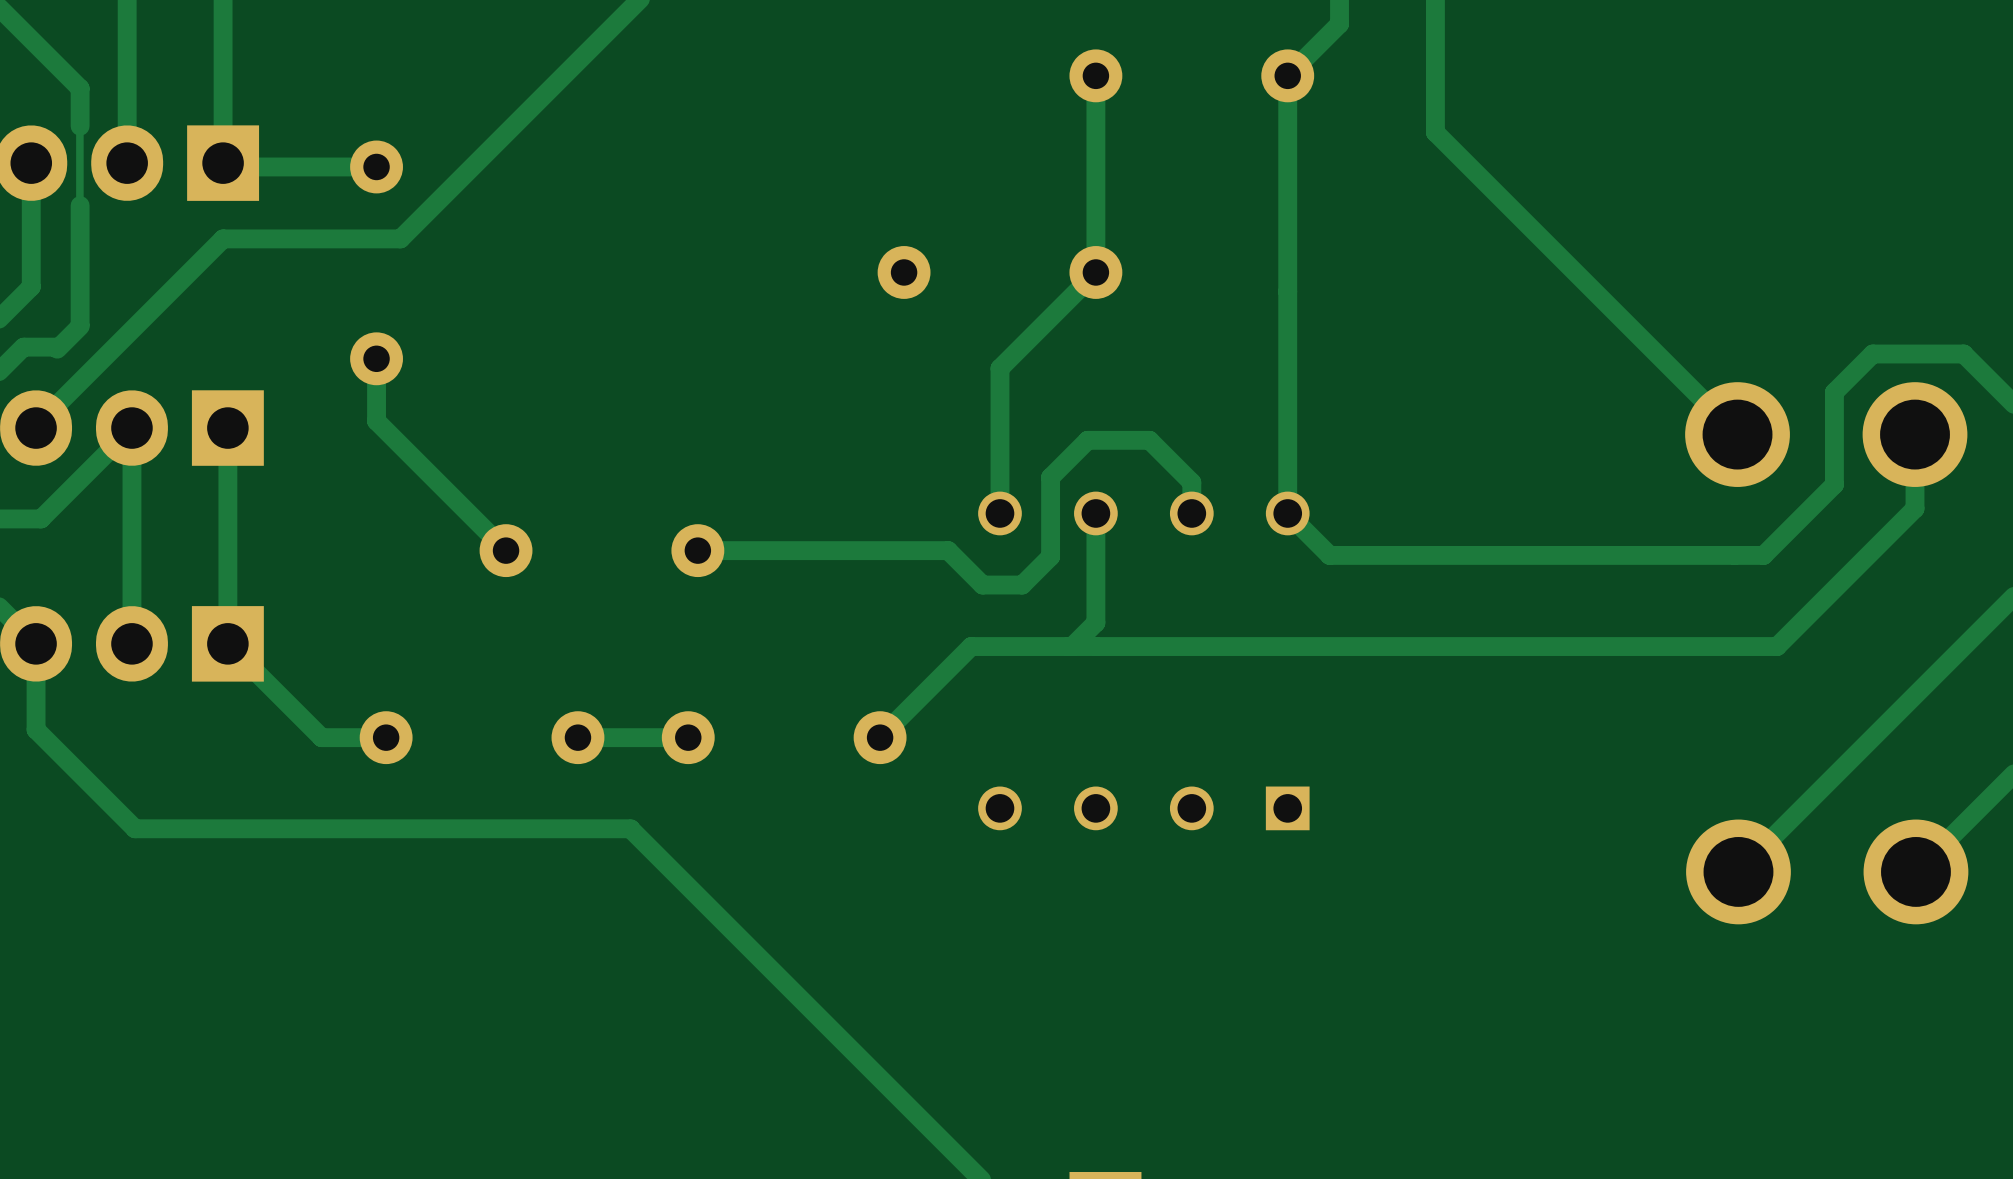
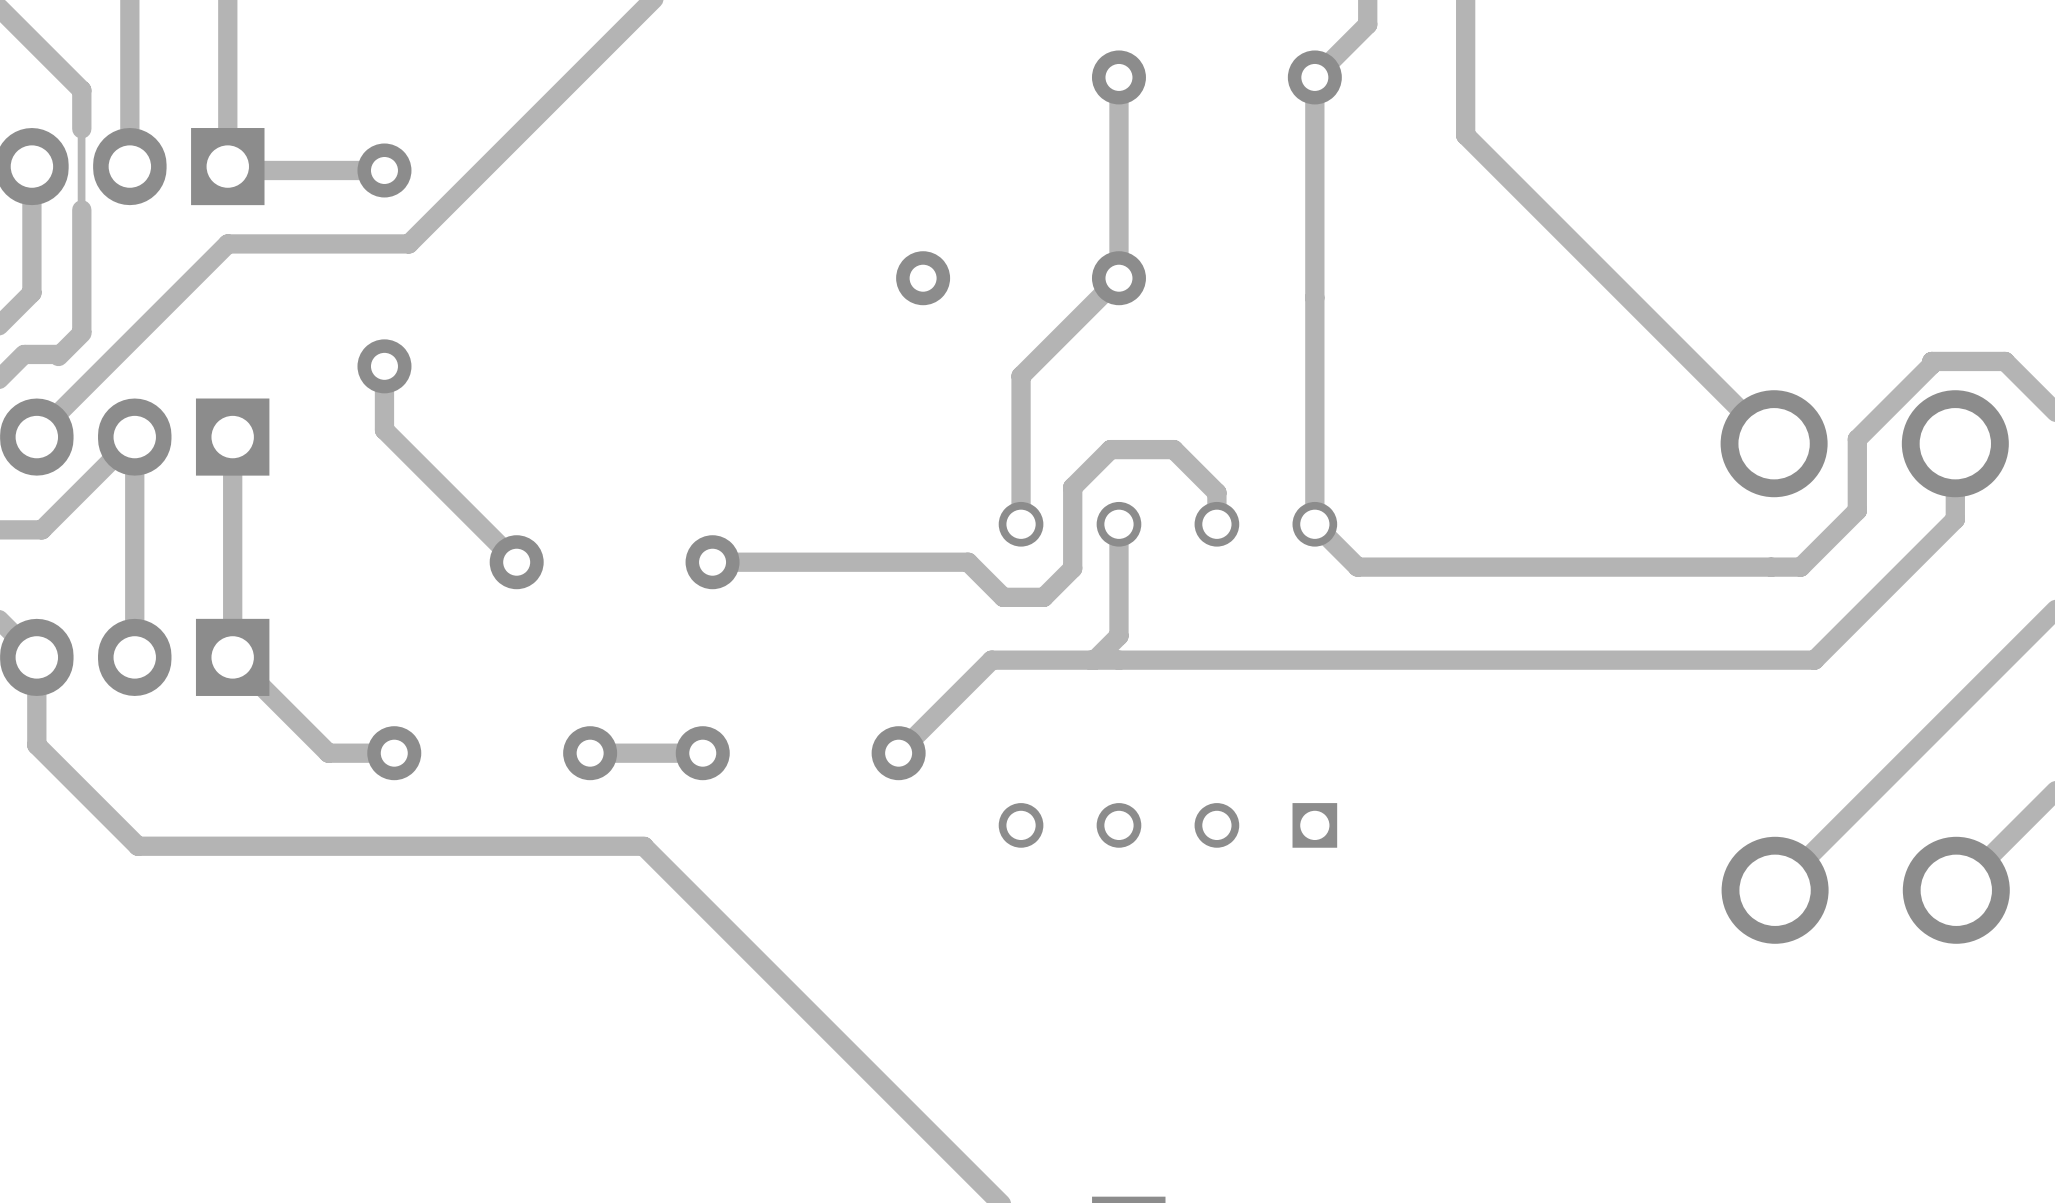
track: (1891, 354) (1872, 354) (1834, 392) (1834, 484) (1819, 500) -> (1931, 361) (1931, 364) (1857, 439) (1857, 510)

